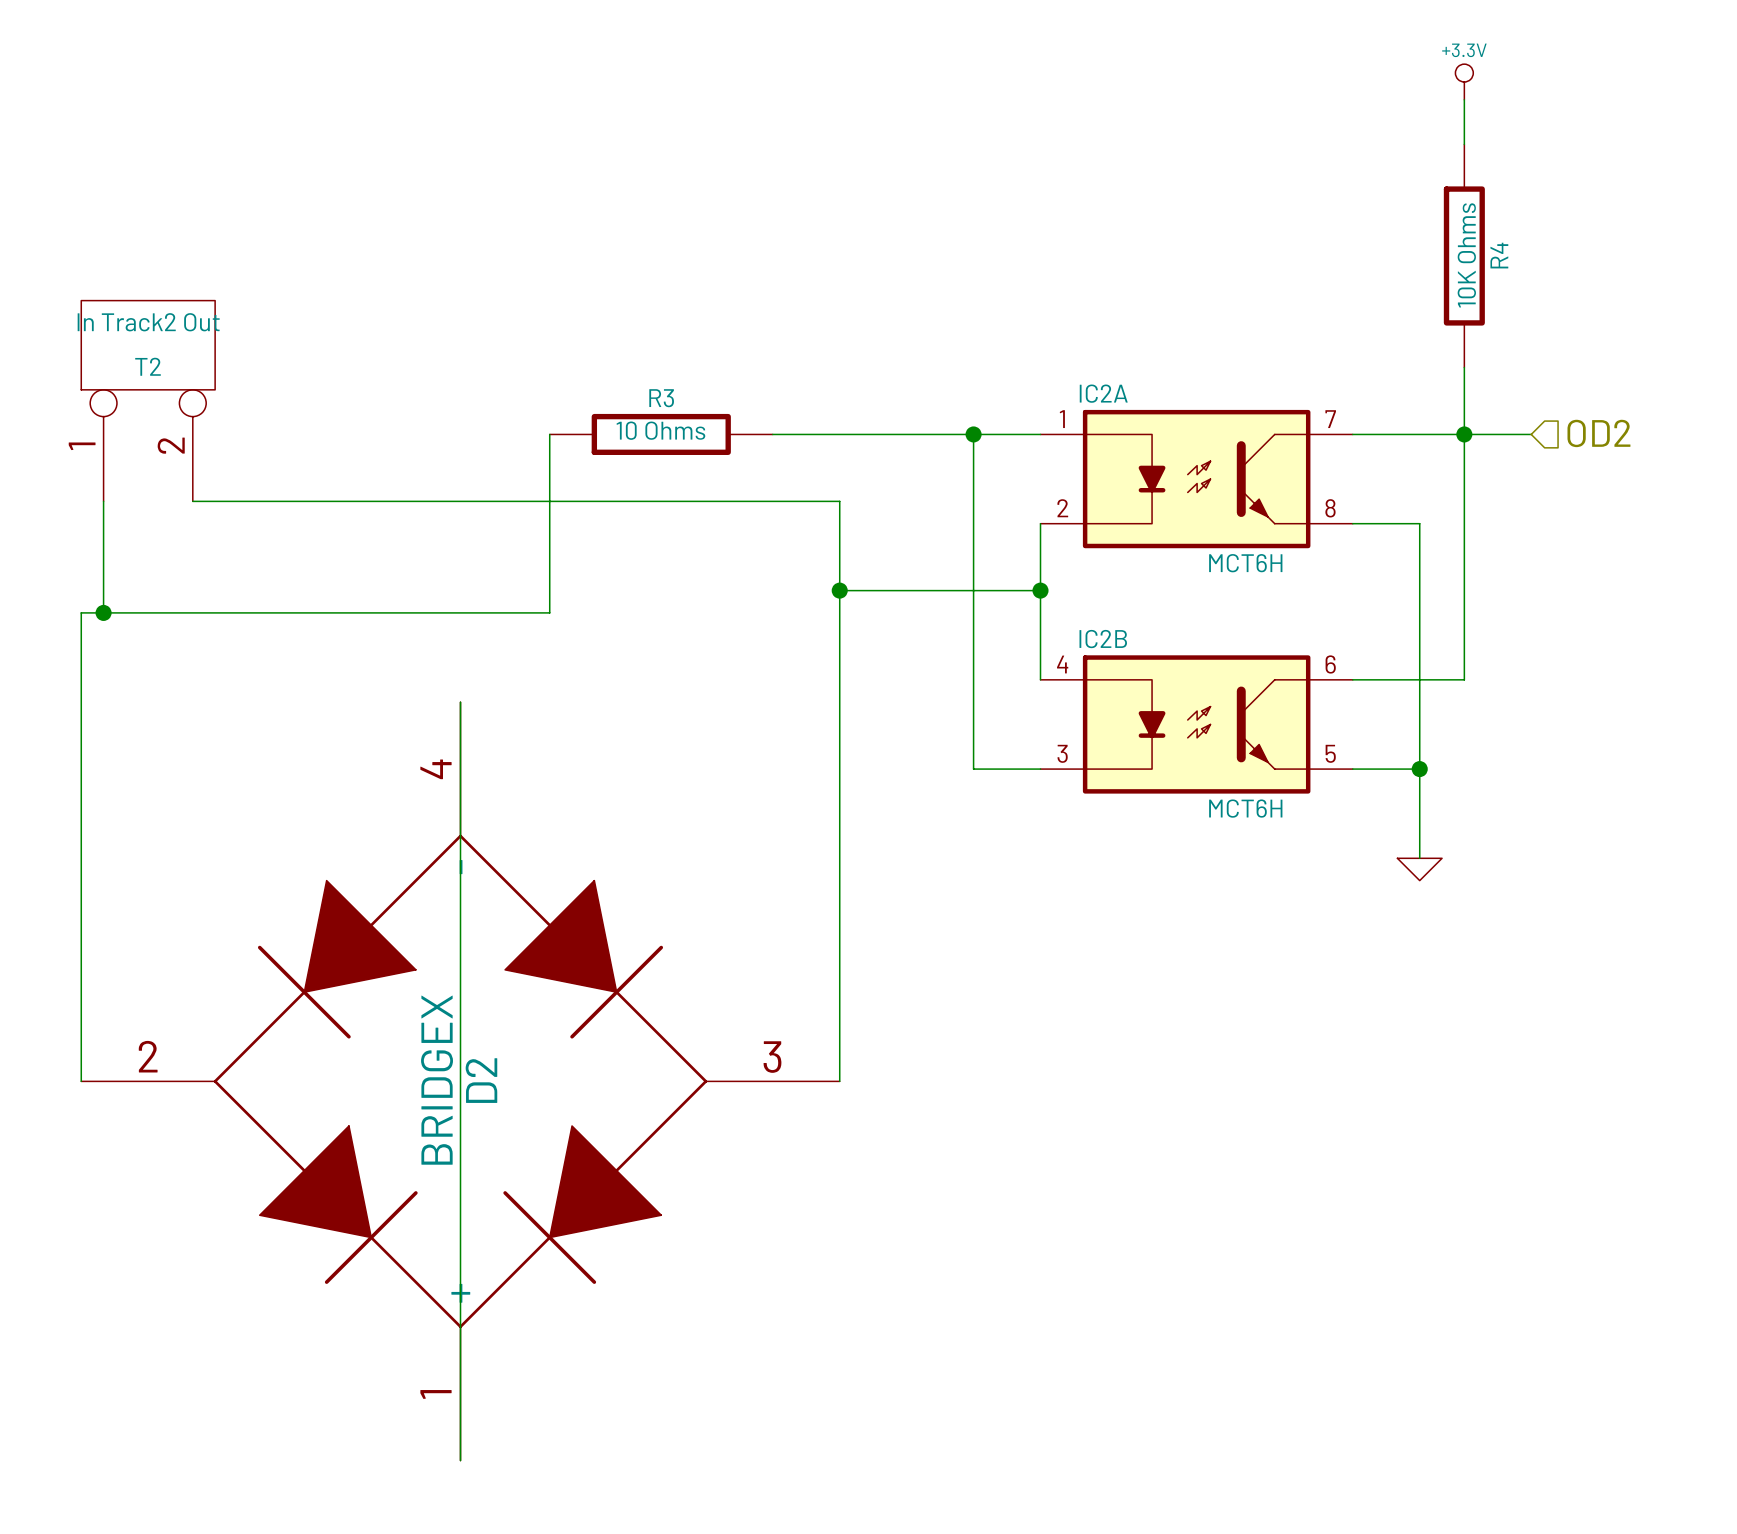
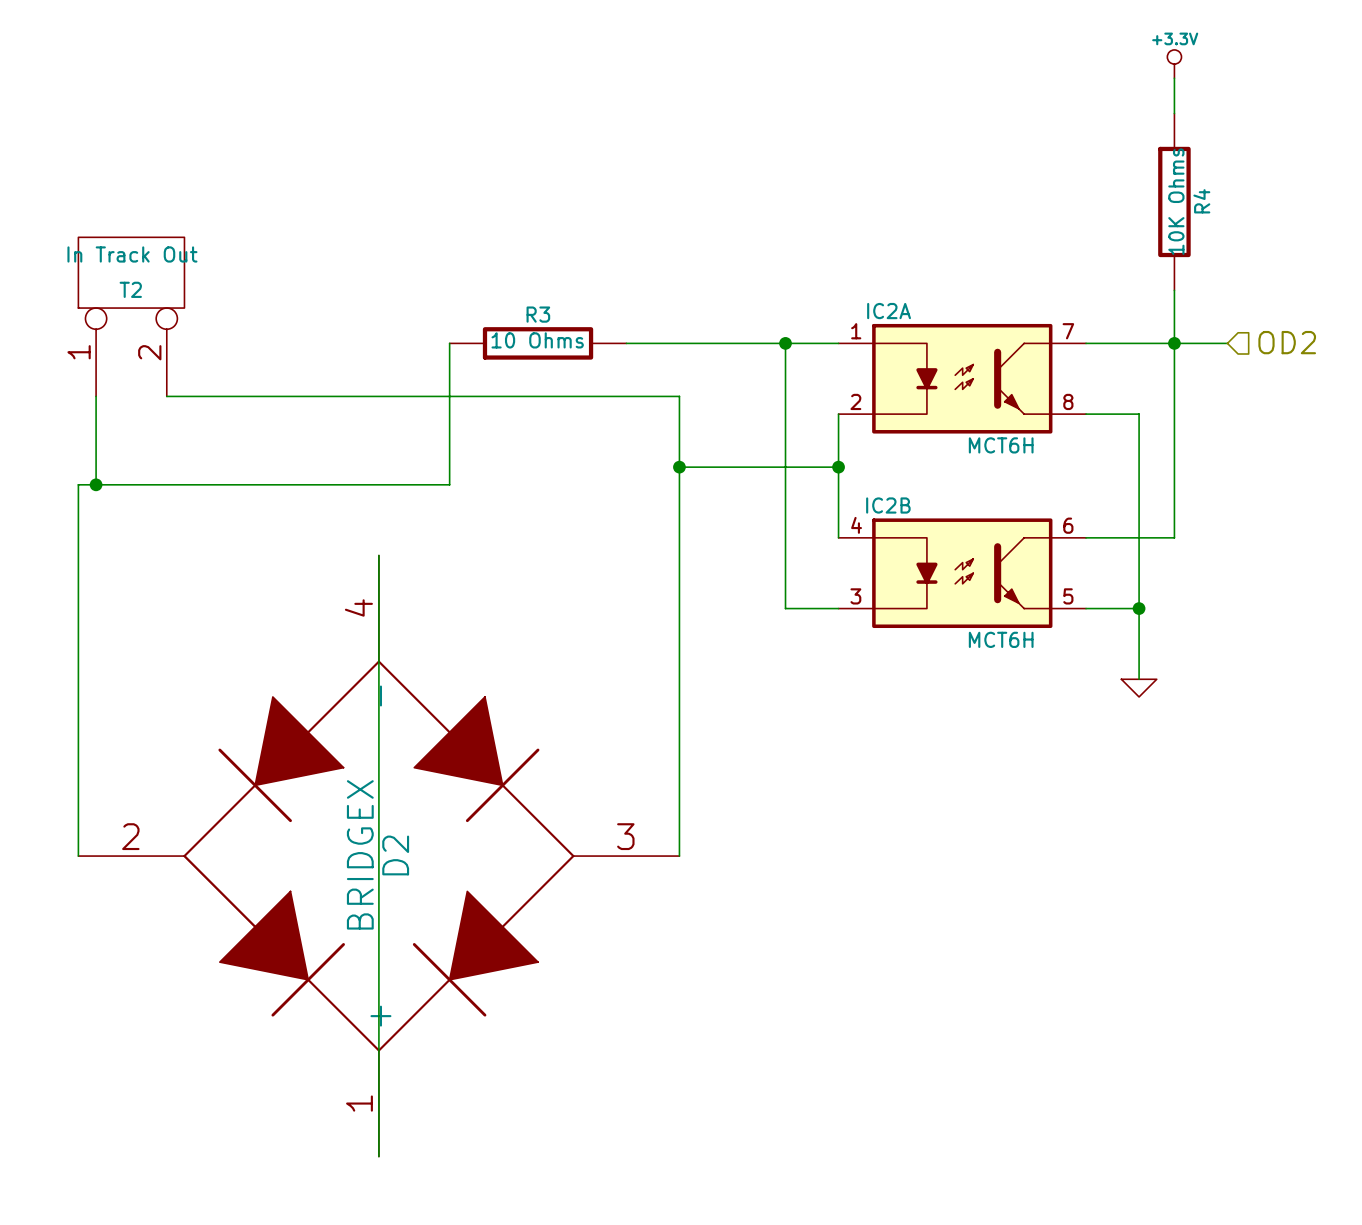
T2 value: In Track2 Out (148, 322) -> In Track Out (132, 254)

